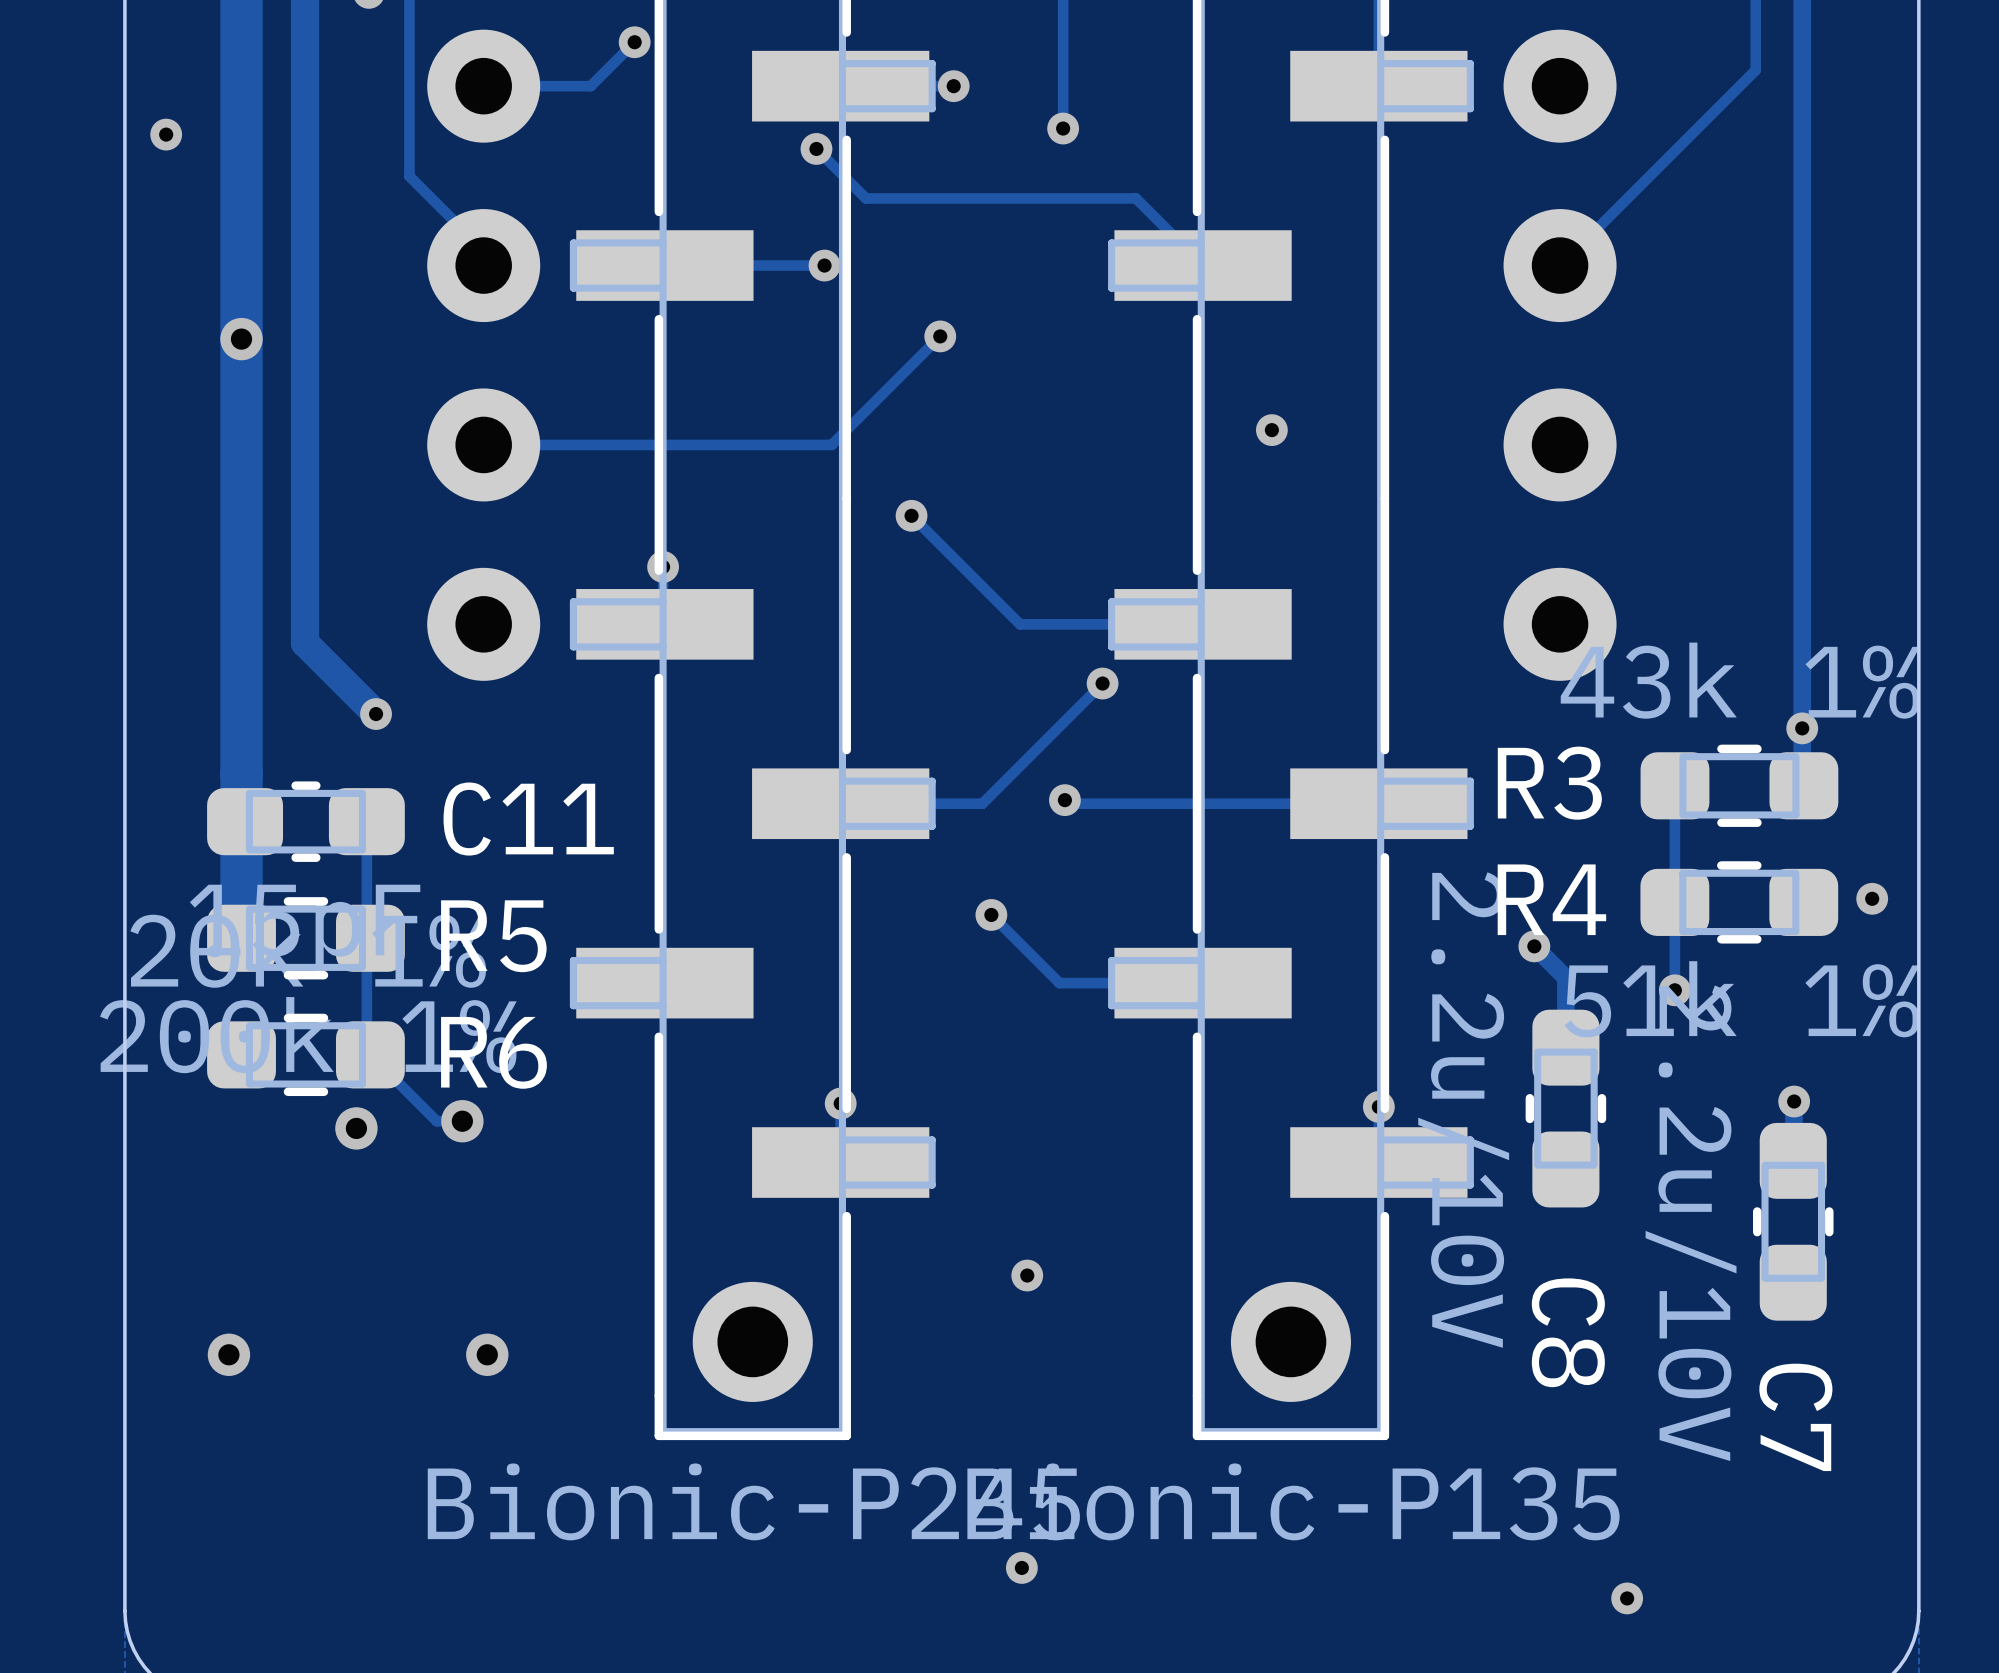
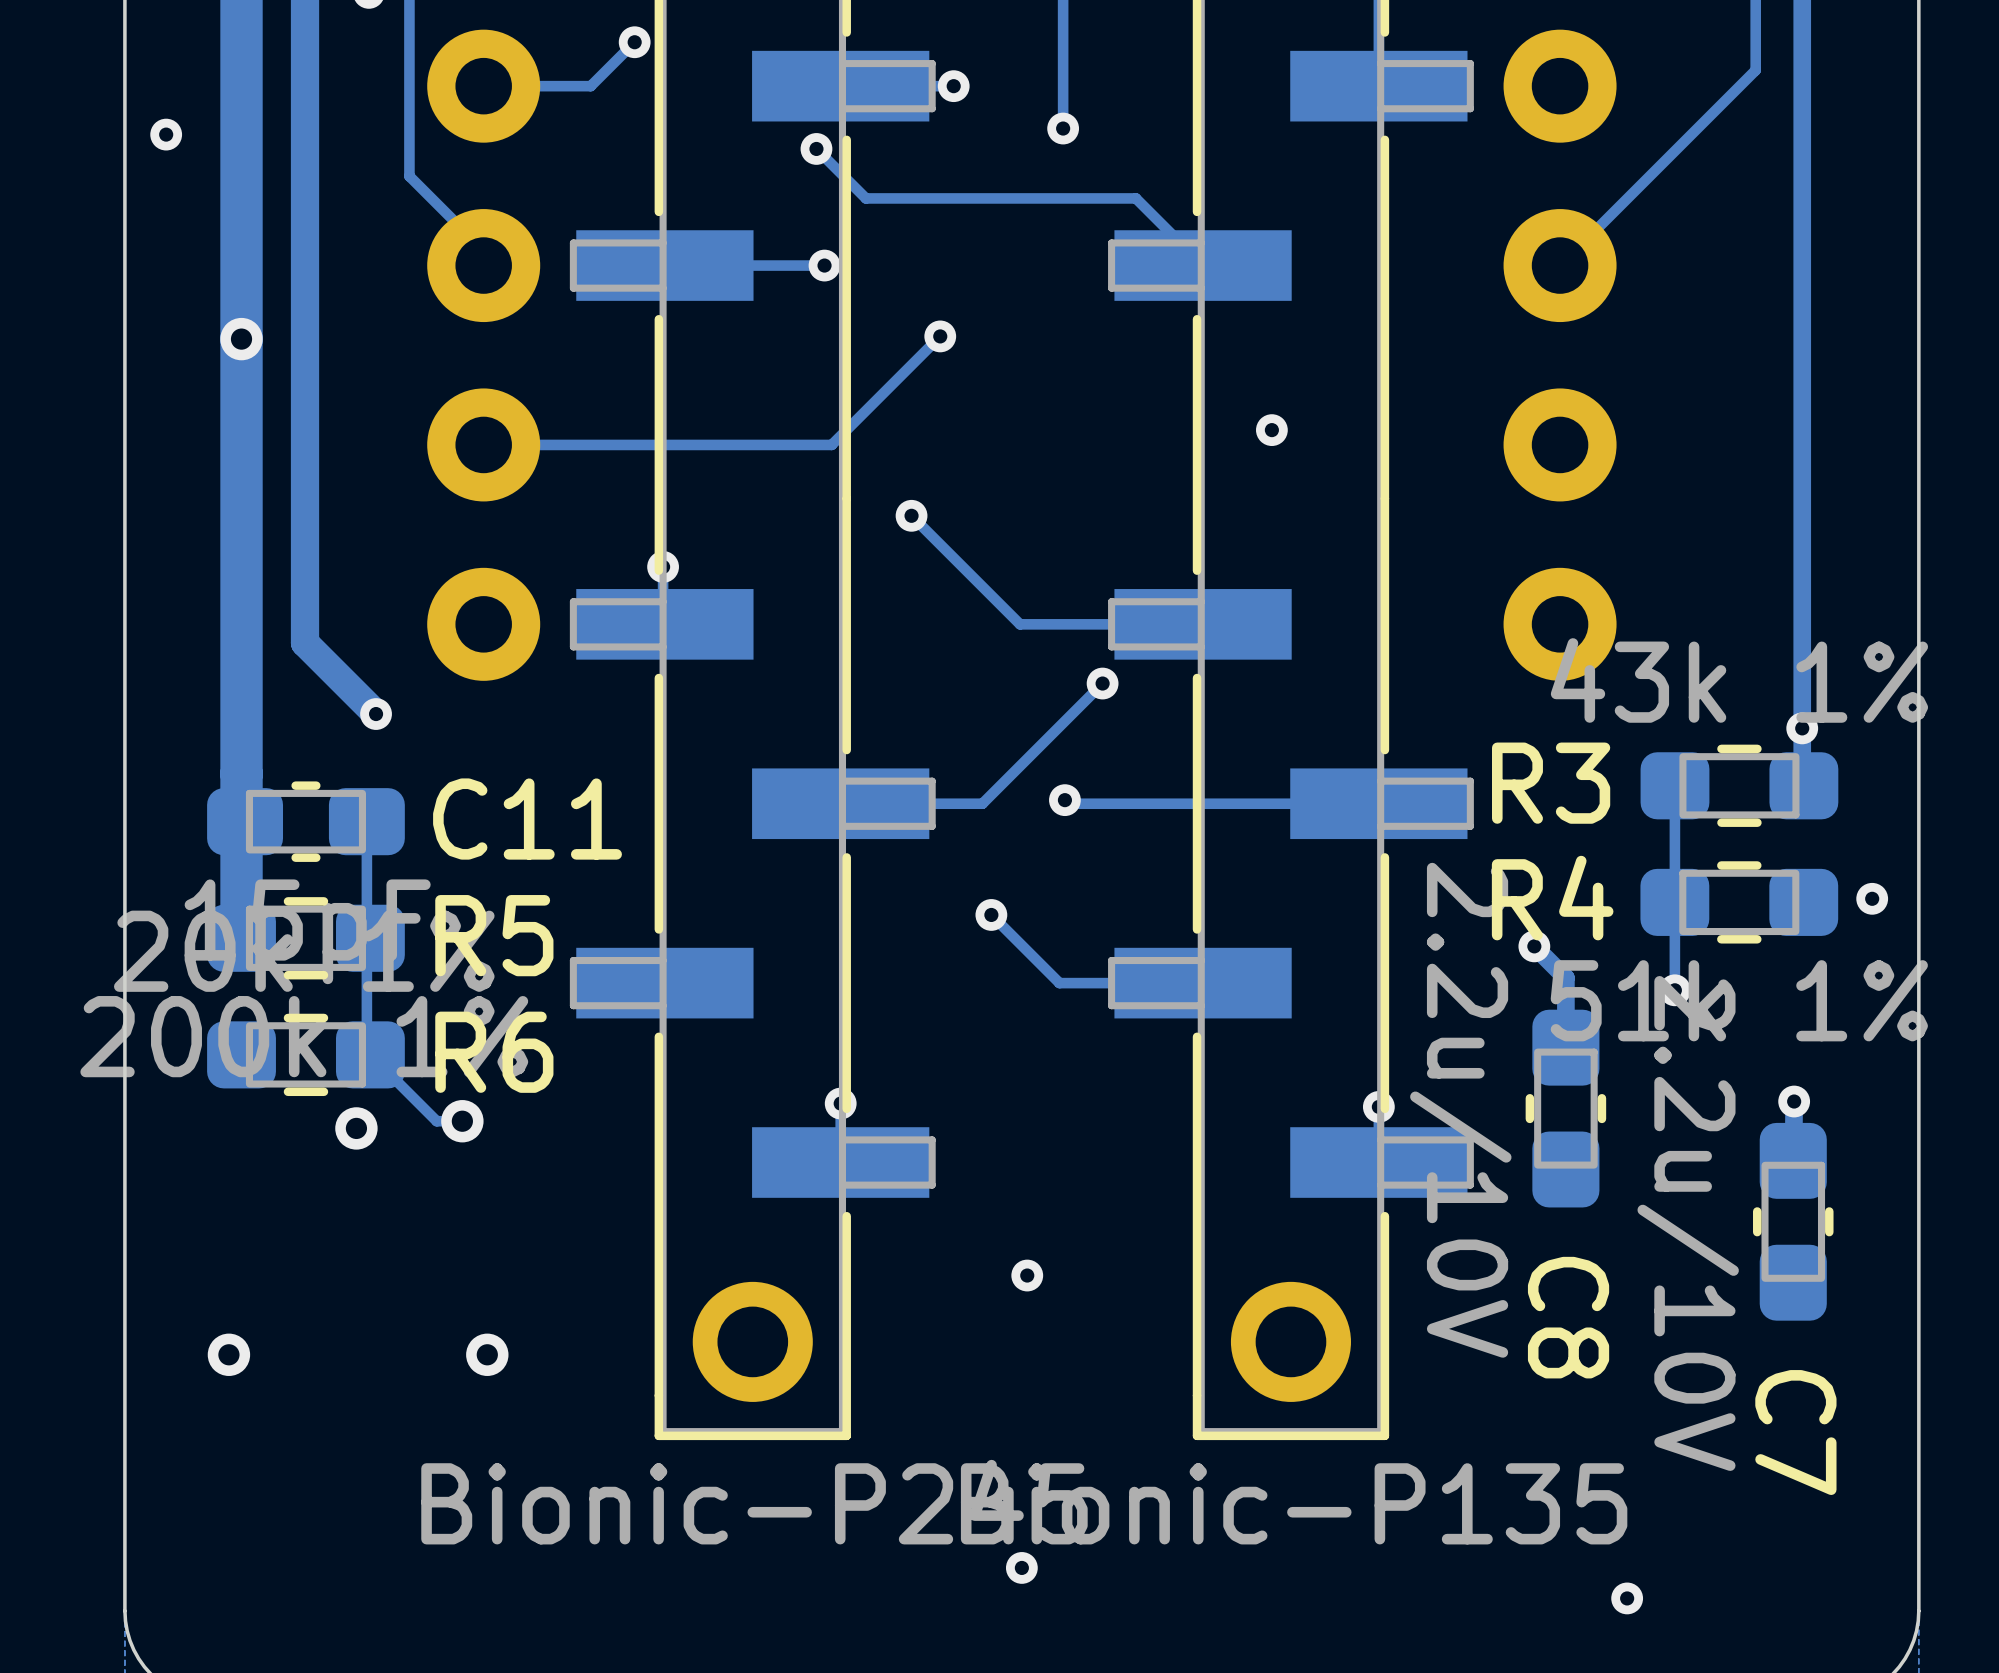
C8 name position: C8 (1568, 1332) -> C8 (1568, 1317)
C7 name position: C7 (1795, 1417) -> C7 (1795, 1432)

